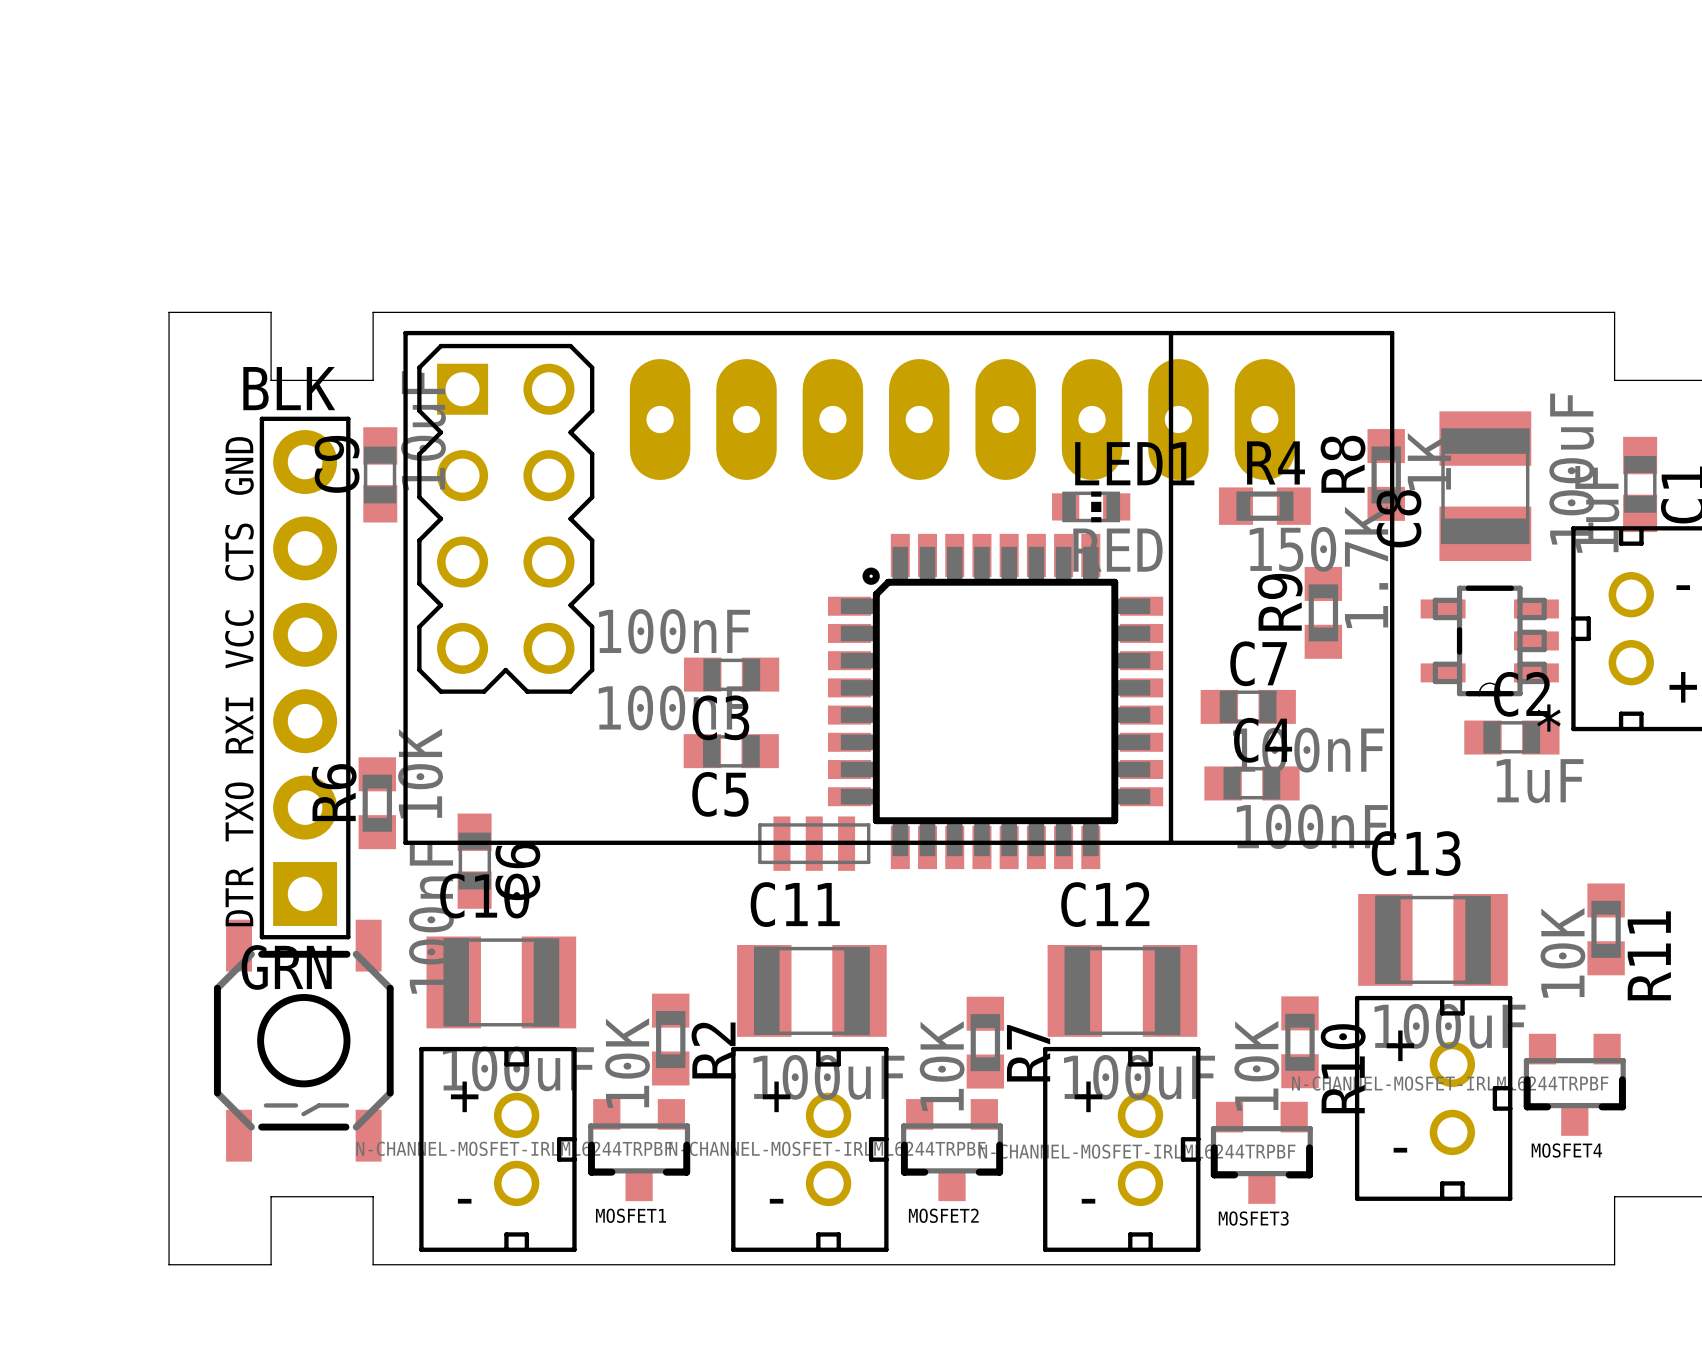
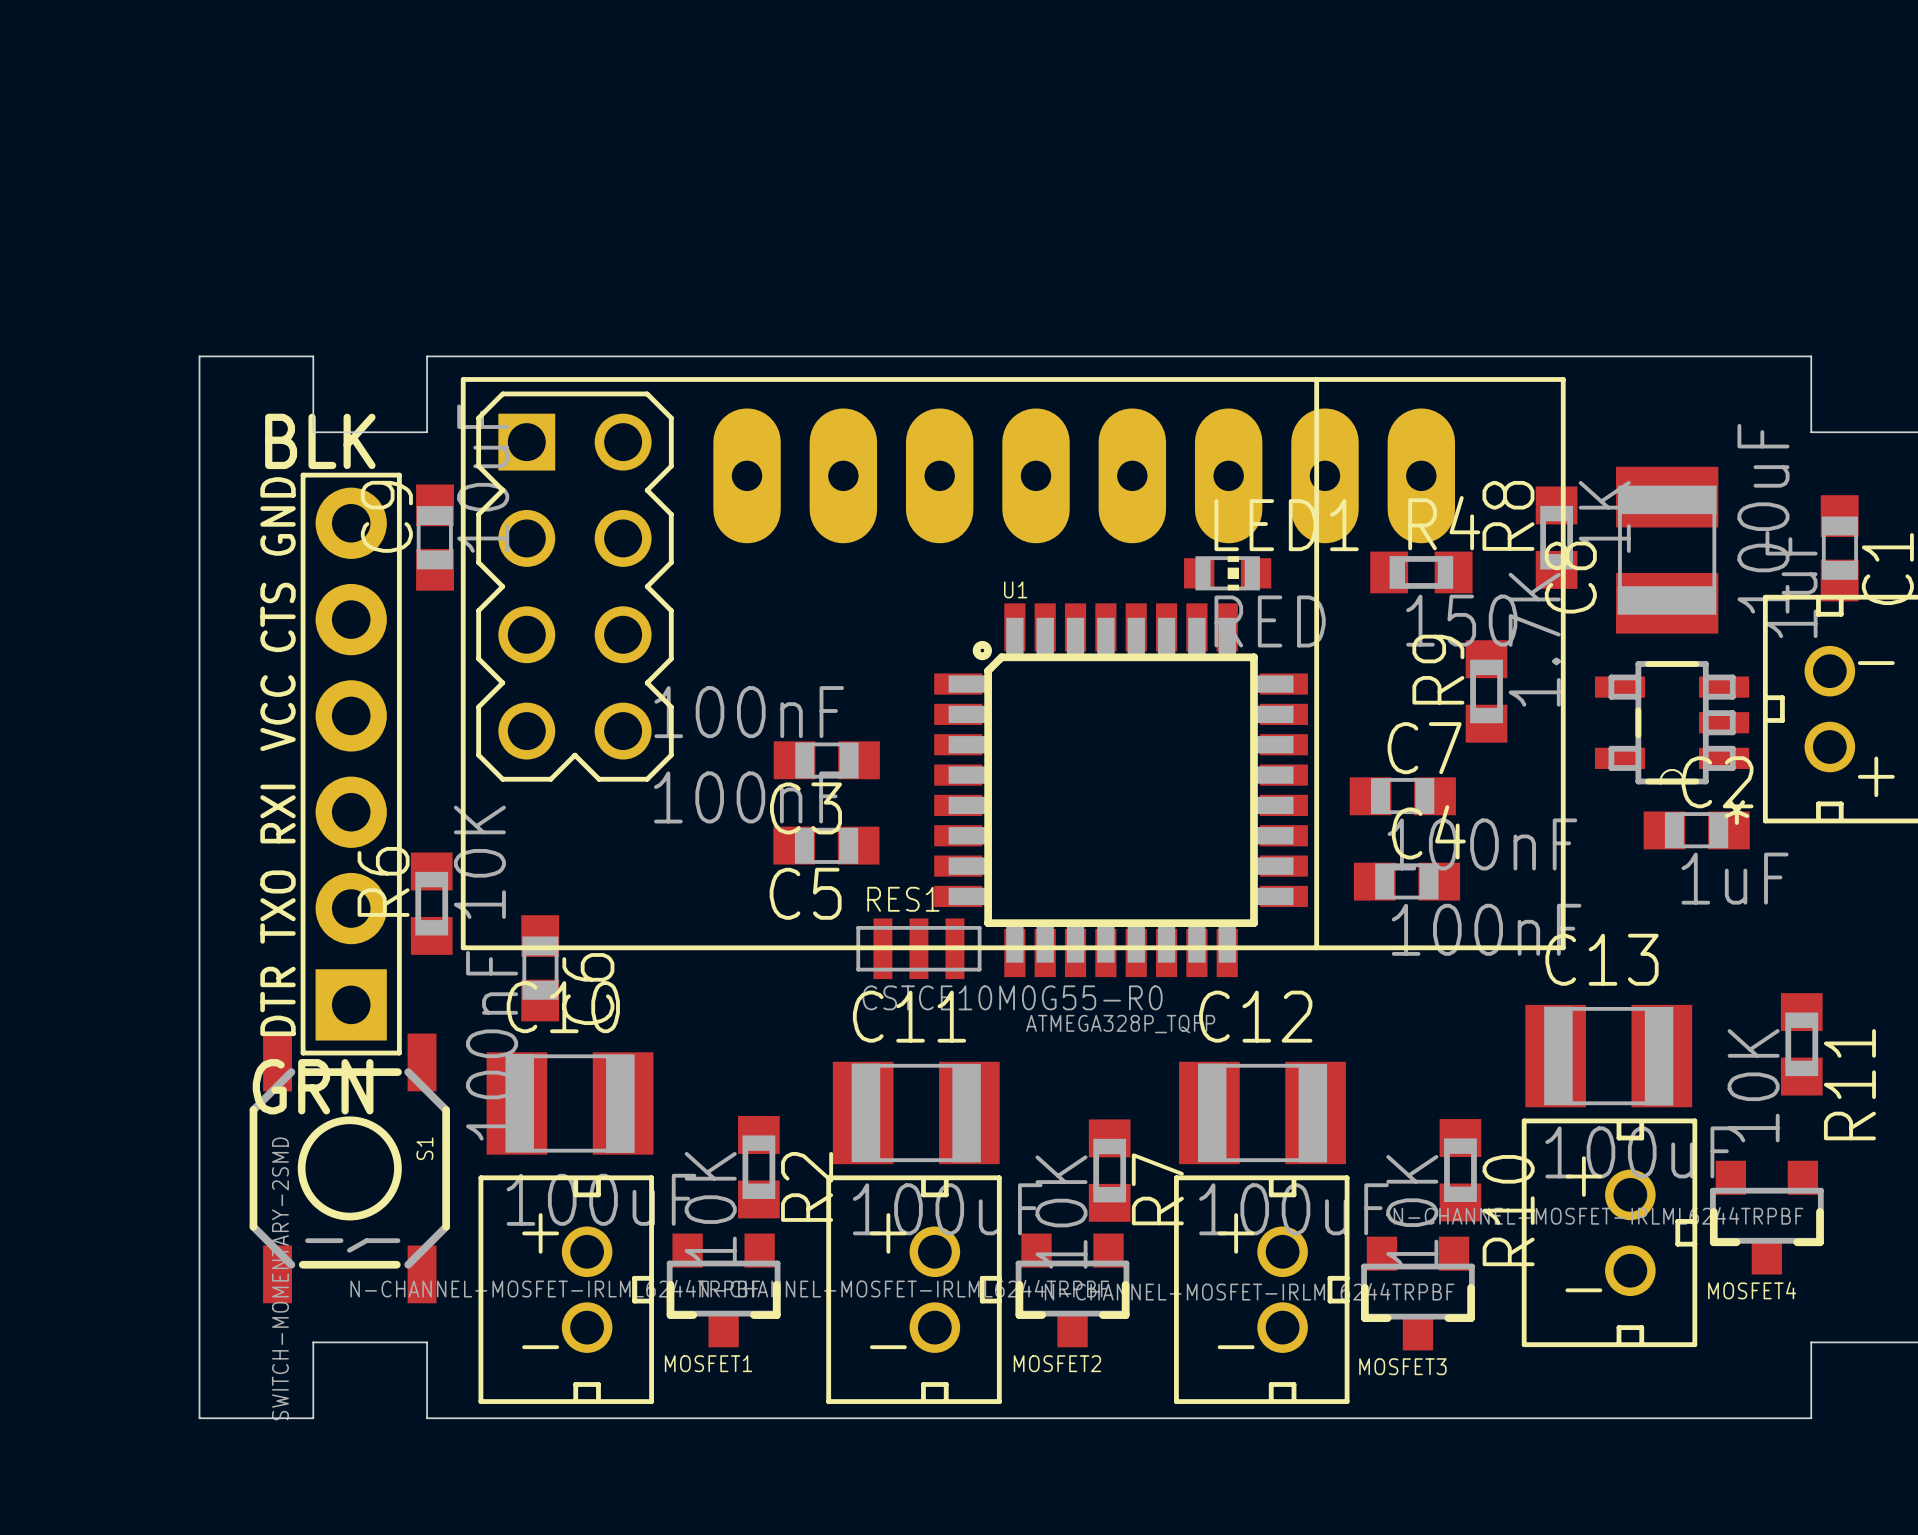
U1 name: none -> U1 (1015, 589)
RES1 name: none -> RES1 (903, 899)
RES1 value: none -> CSTCE10M0G55-R0 (1012, 997)
U1 value: none -> ATMEGA328P_TQFP (1120, 1024)
S1 name: none -> S1 (424, 1148)
S1 value: none -> SWITCH-MOMENTARY-2SMD (280, 1278)

